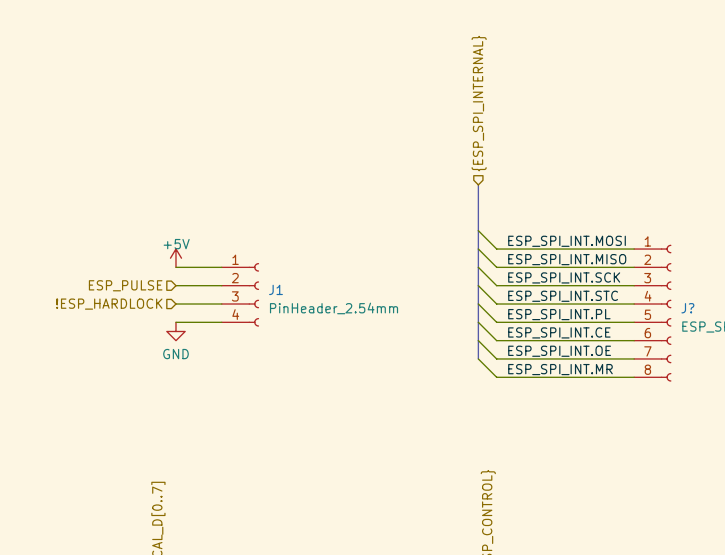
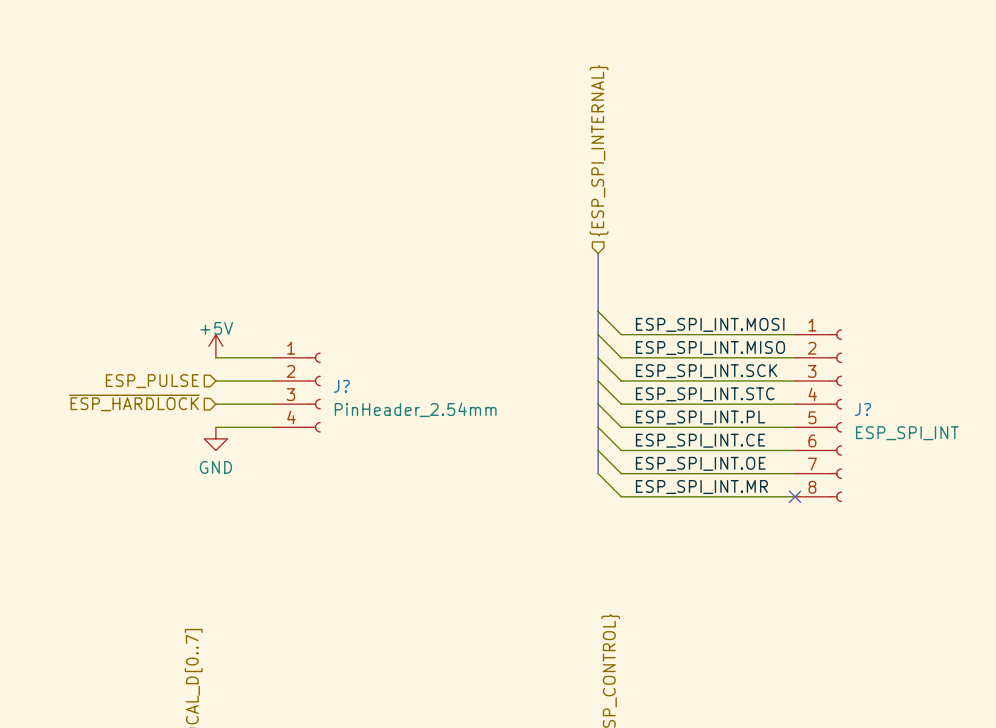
J1 name: J1 (275, 289) -> J? (341, 386)
hierarchical label: !ESP_HARDLOCK (109, 304) -> ~{ESP_HARDLOCK} (134, 402)
no-connect mark: none -> (795, 496)

